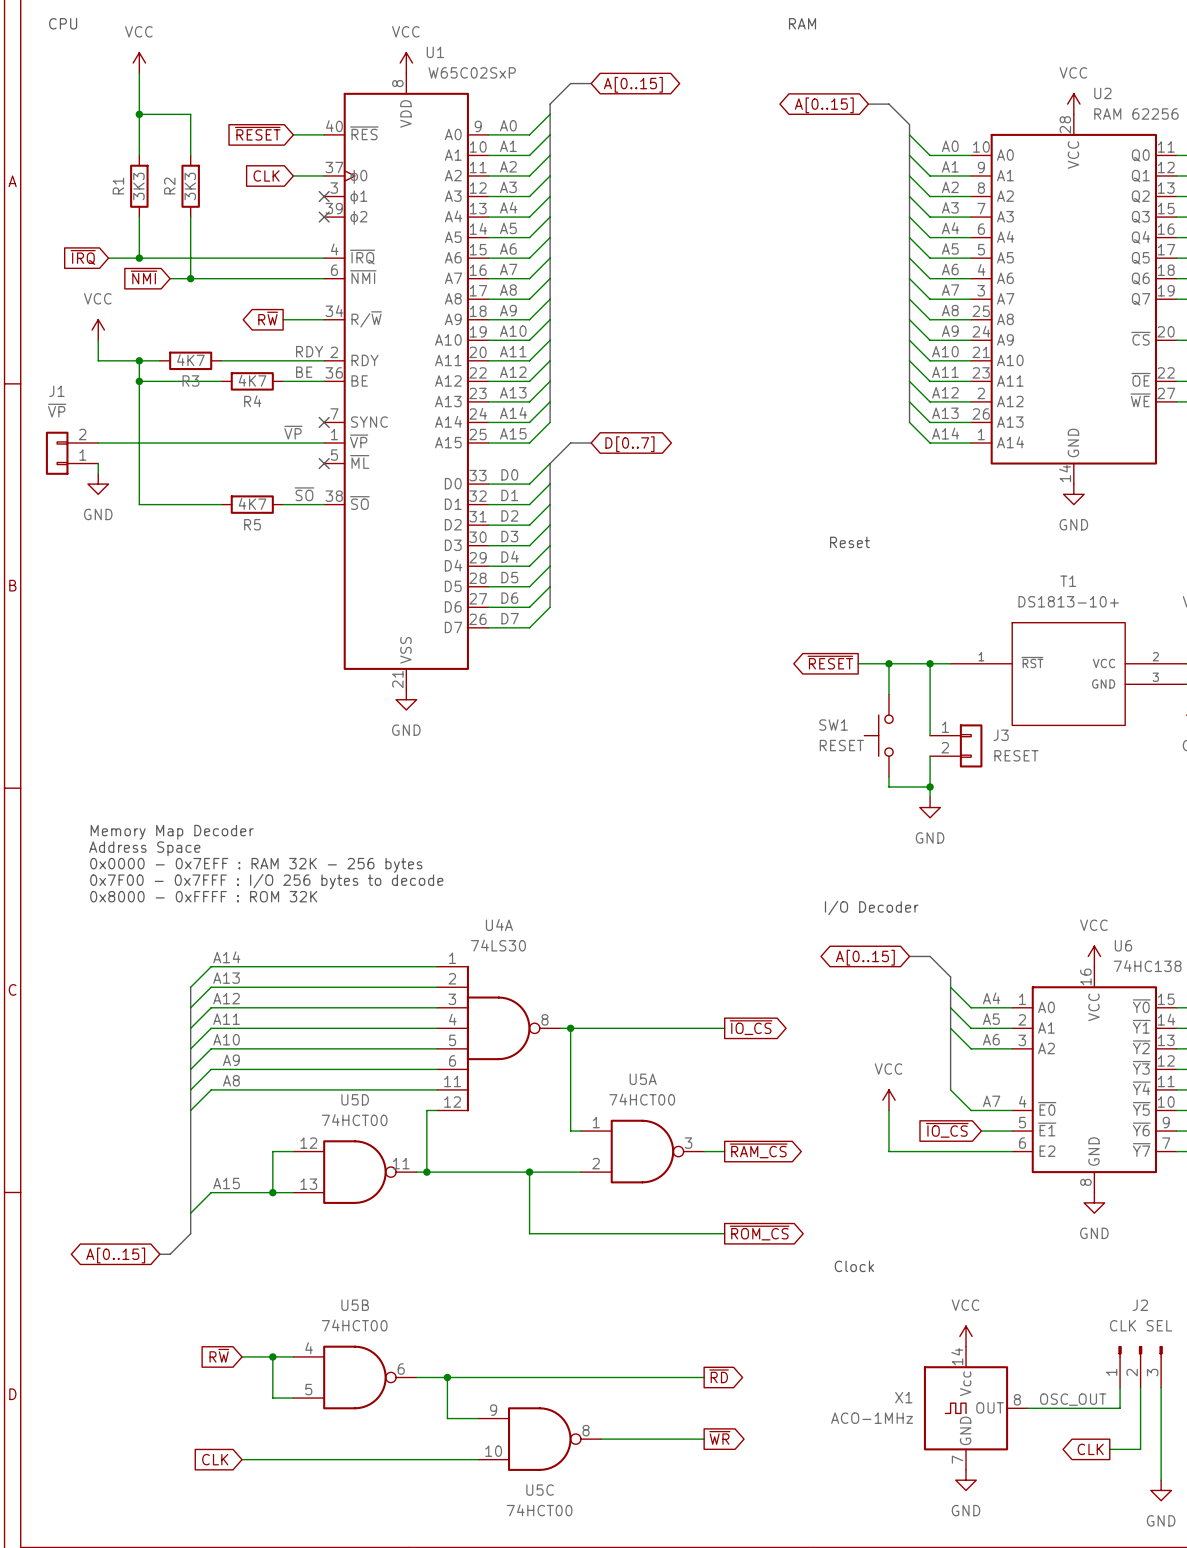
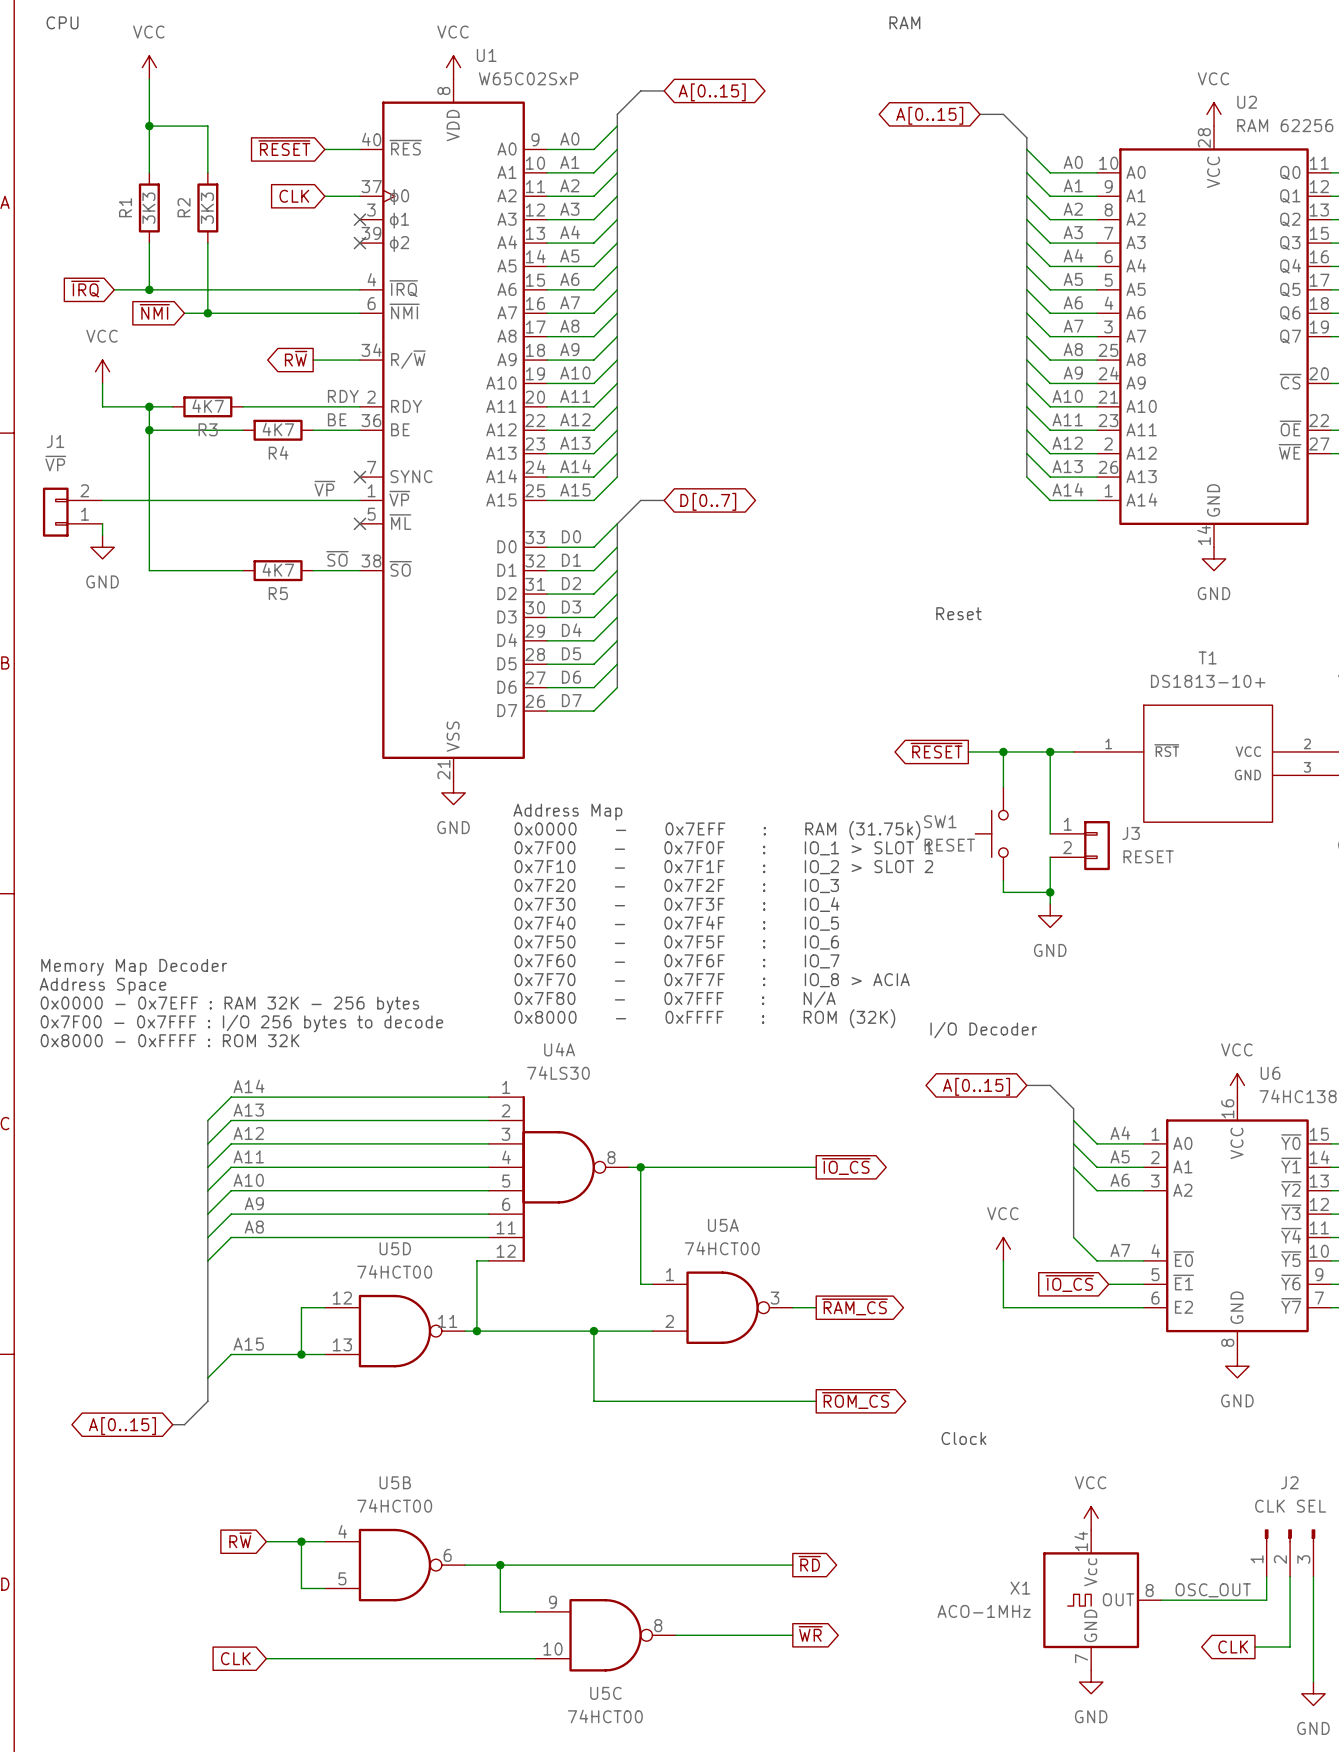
text: none -> Address Map (567, 812)
text: none -> 0x0000 - 0x7EFF : RAM (31.75k) (717, 830)
text: none -> 0x7F00 - 0x7F0F : IO_1 > SLOT 1 (723, 848)
text: none -> 0x7F10 - 0x7F1F : IO_2 > SLOT 2 (723, 867)
text: none -> 0x7F20 - 0x7F2F : IO_3 (676, 886)
text: none -> 0x7F30 - 0x7F3F : IO_4 (677, 904)
text: none -> 0x7F40 - 0x7F4F : IO_5 (676, 923)
text: none -> 0x7F50 - 0x7F5F : IO_6 (676, 942)
text position: Memory Map Decoder (172, 832) -> Memory Map Decoder (134, 967)
text: none -> 0x7F60 - 0x7F6F : IO_7 (677, 961)
text position: Address Space (144, 848) -> Address Space (102, 986)
text: none -> 0x7F70 - 0x7F7F : IO_8 > ACIA (712, 980)
text position: 0x0000 - 0x7EFF : RAM 32K - 256 bytes (256, 865) -> 0x0000 - 0x7EFF : RAM 32K - 256 bytes (229, 1005)
text position: 0x7F00 - 0x7FFF : I/O 256 bytes to decode (266, 881) -> 0x7F00 - 0x7FFF : I/O 256 bytes to decode (241, 1023)
text: none -> 0x7F80 - 0x7FFF : N/A (675, 999)
text position: 0x8000 - 0xFFFF : ROM 32K (203, 896) -> 0x8000 - 0xFFFF : ROM 32K (170, 1040)
text: none -> 0x8000 - 0xFFFF : ROM (32K) (704, 1018)

